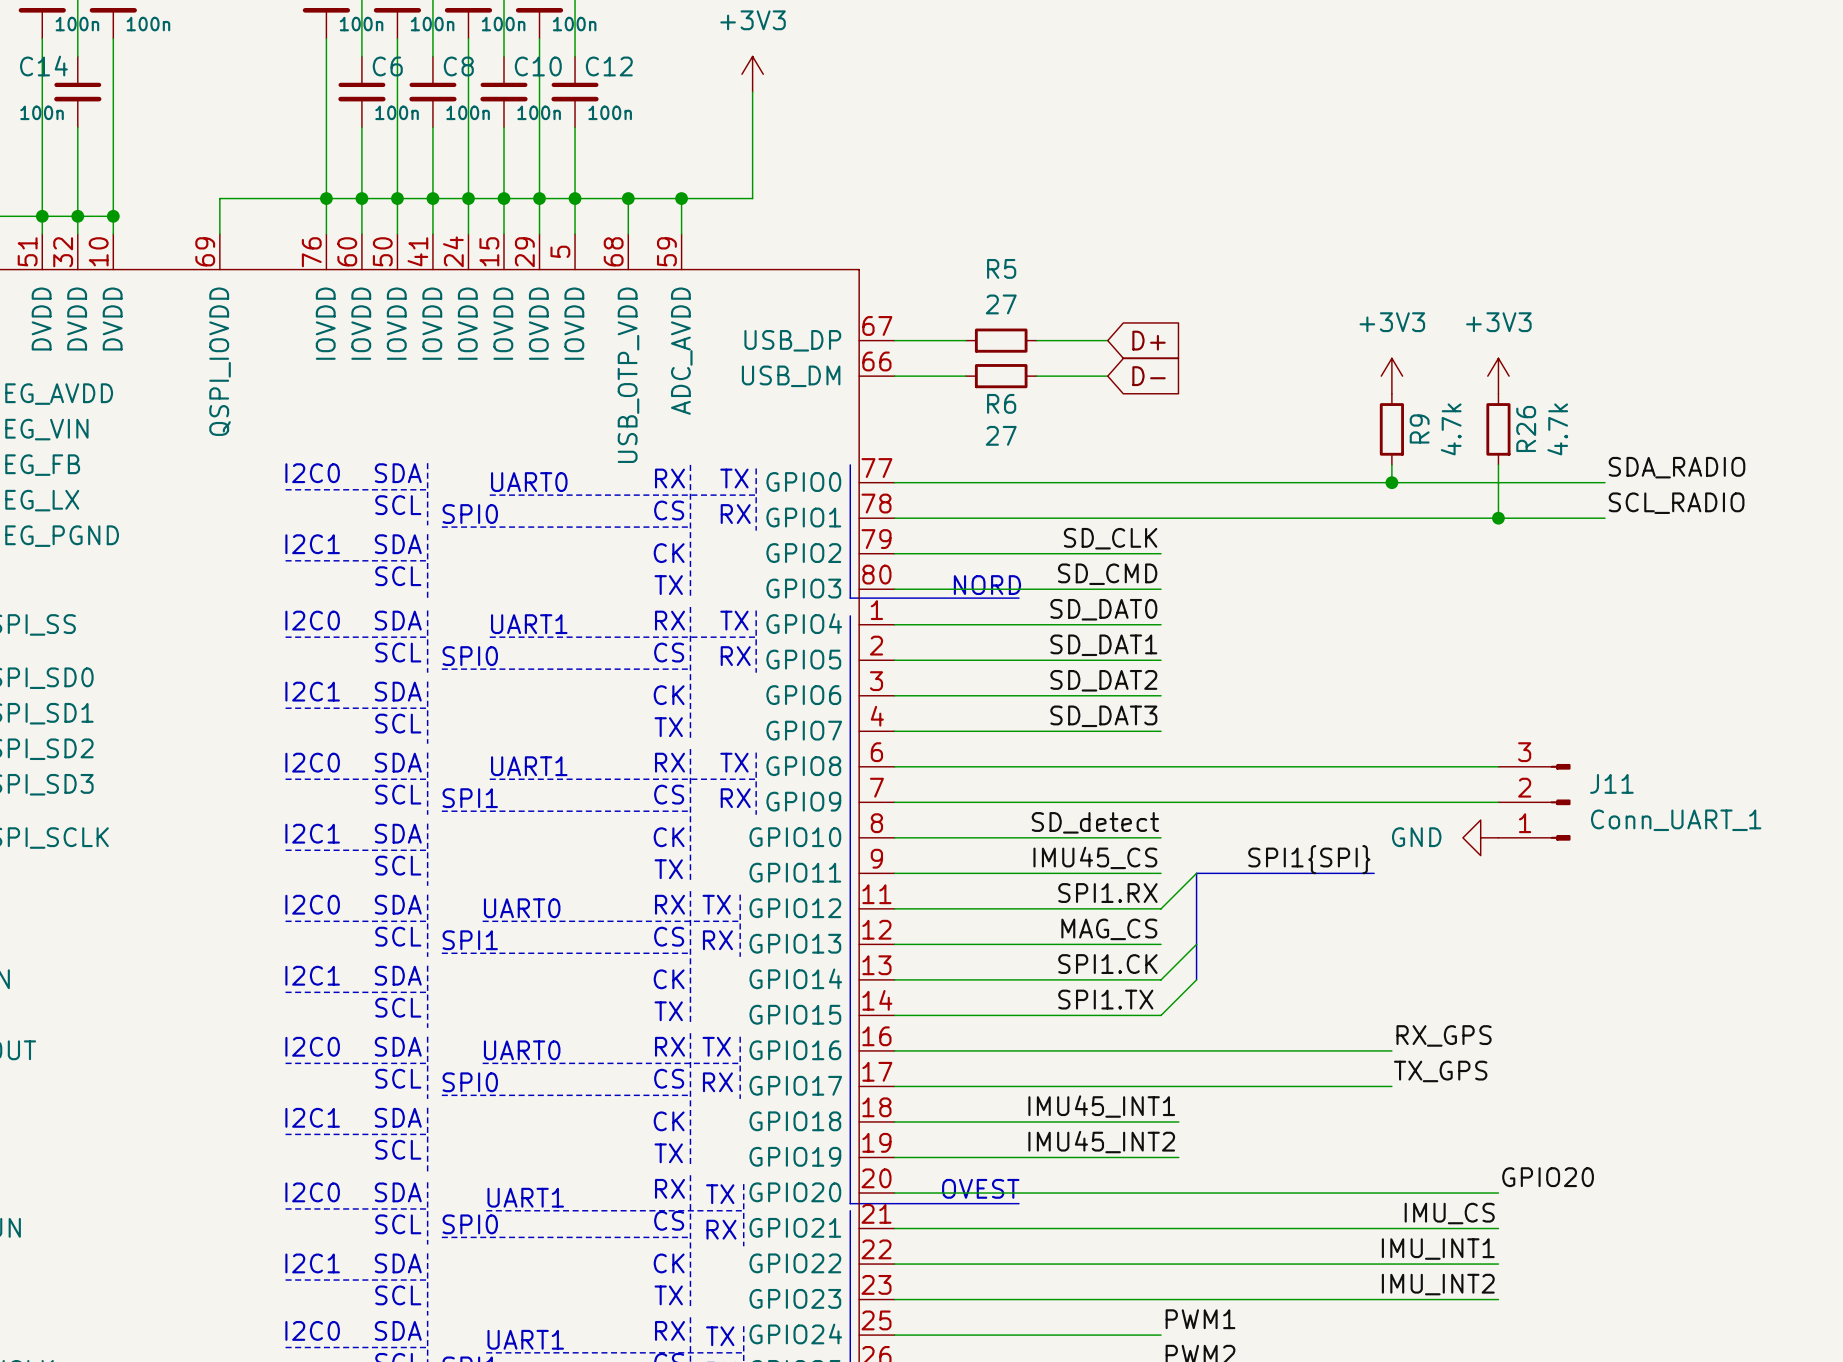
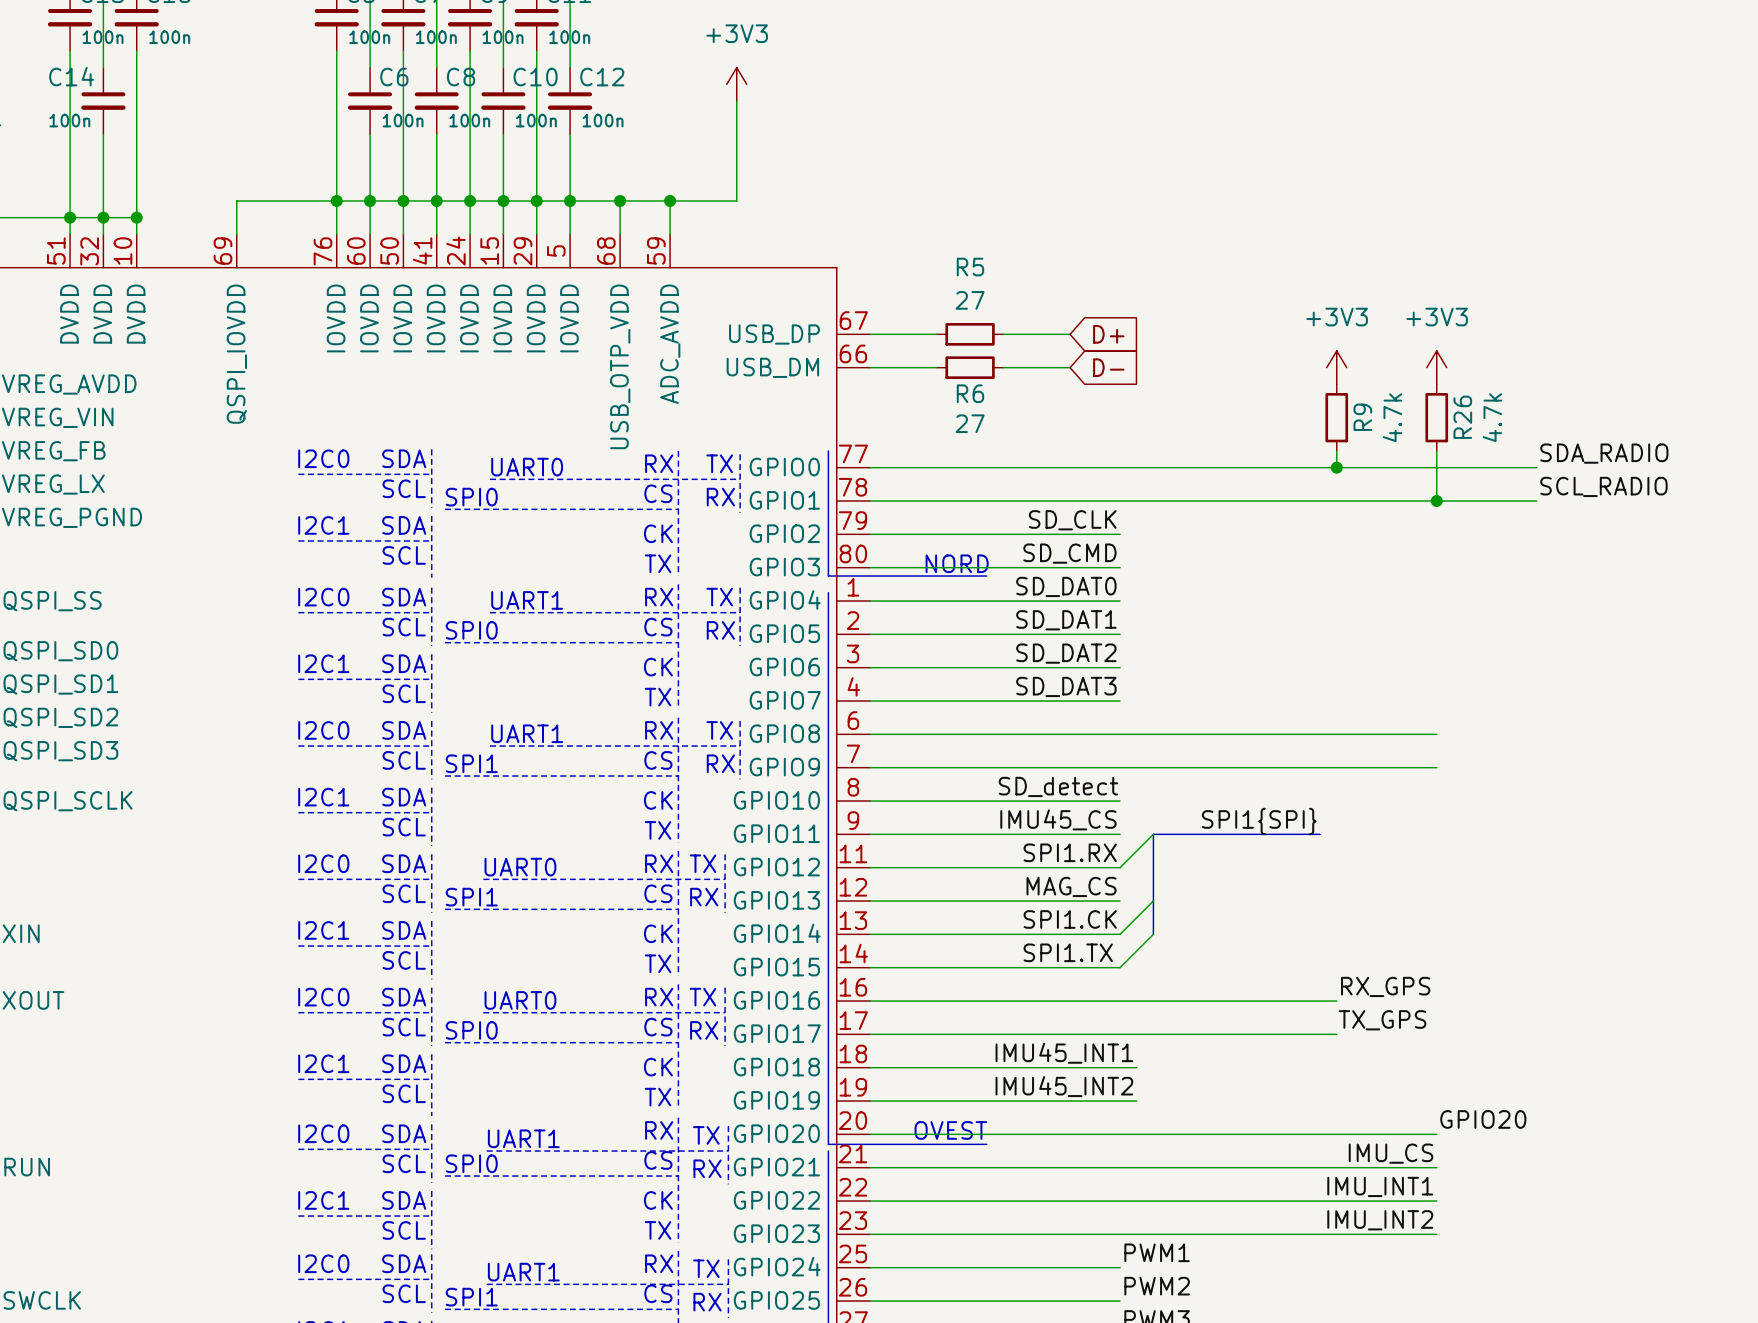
J11: Conn_UART_1 (1534, 802) -> none
power symbol: GND (1480, 837) -> none

